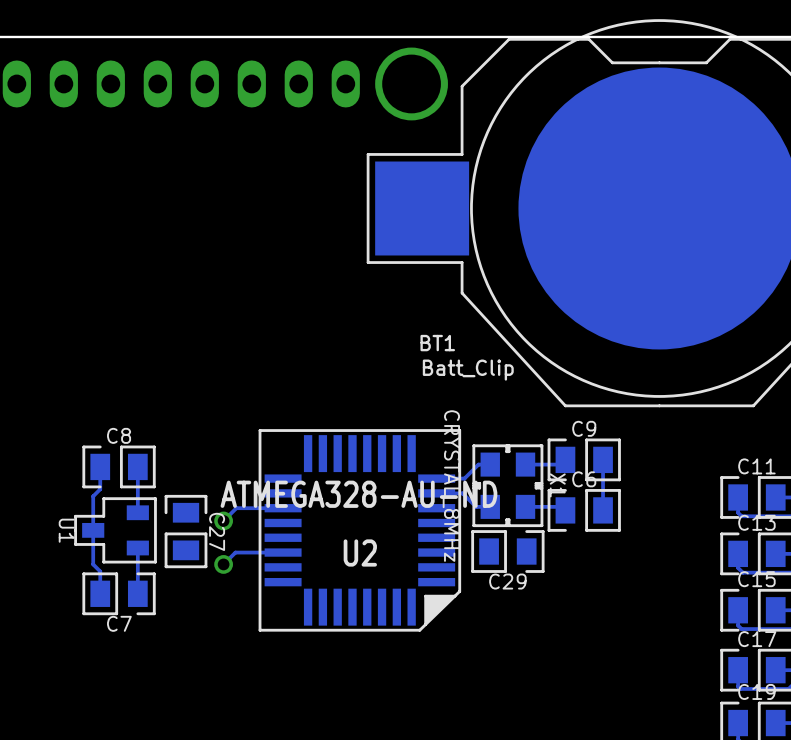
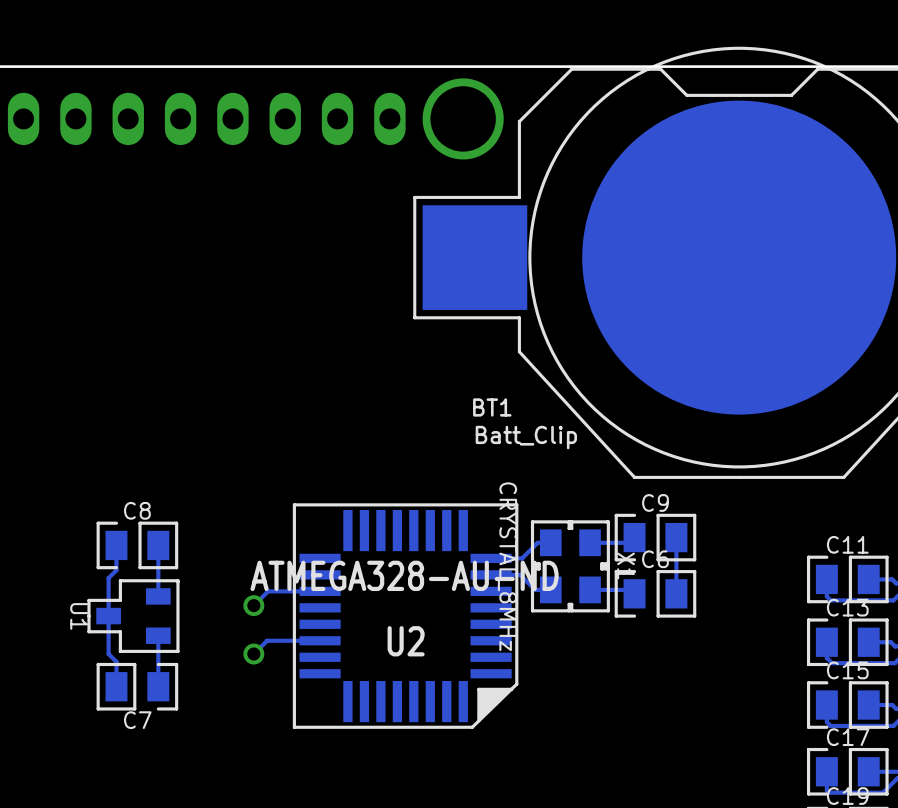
C27: (186, 531) -> none
C29: (507, 551) -> none

